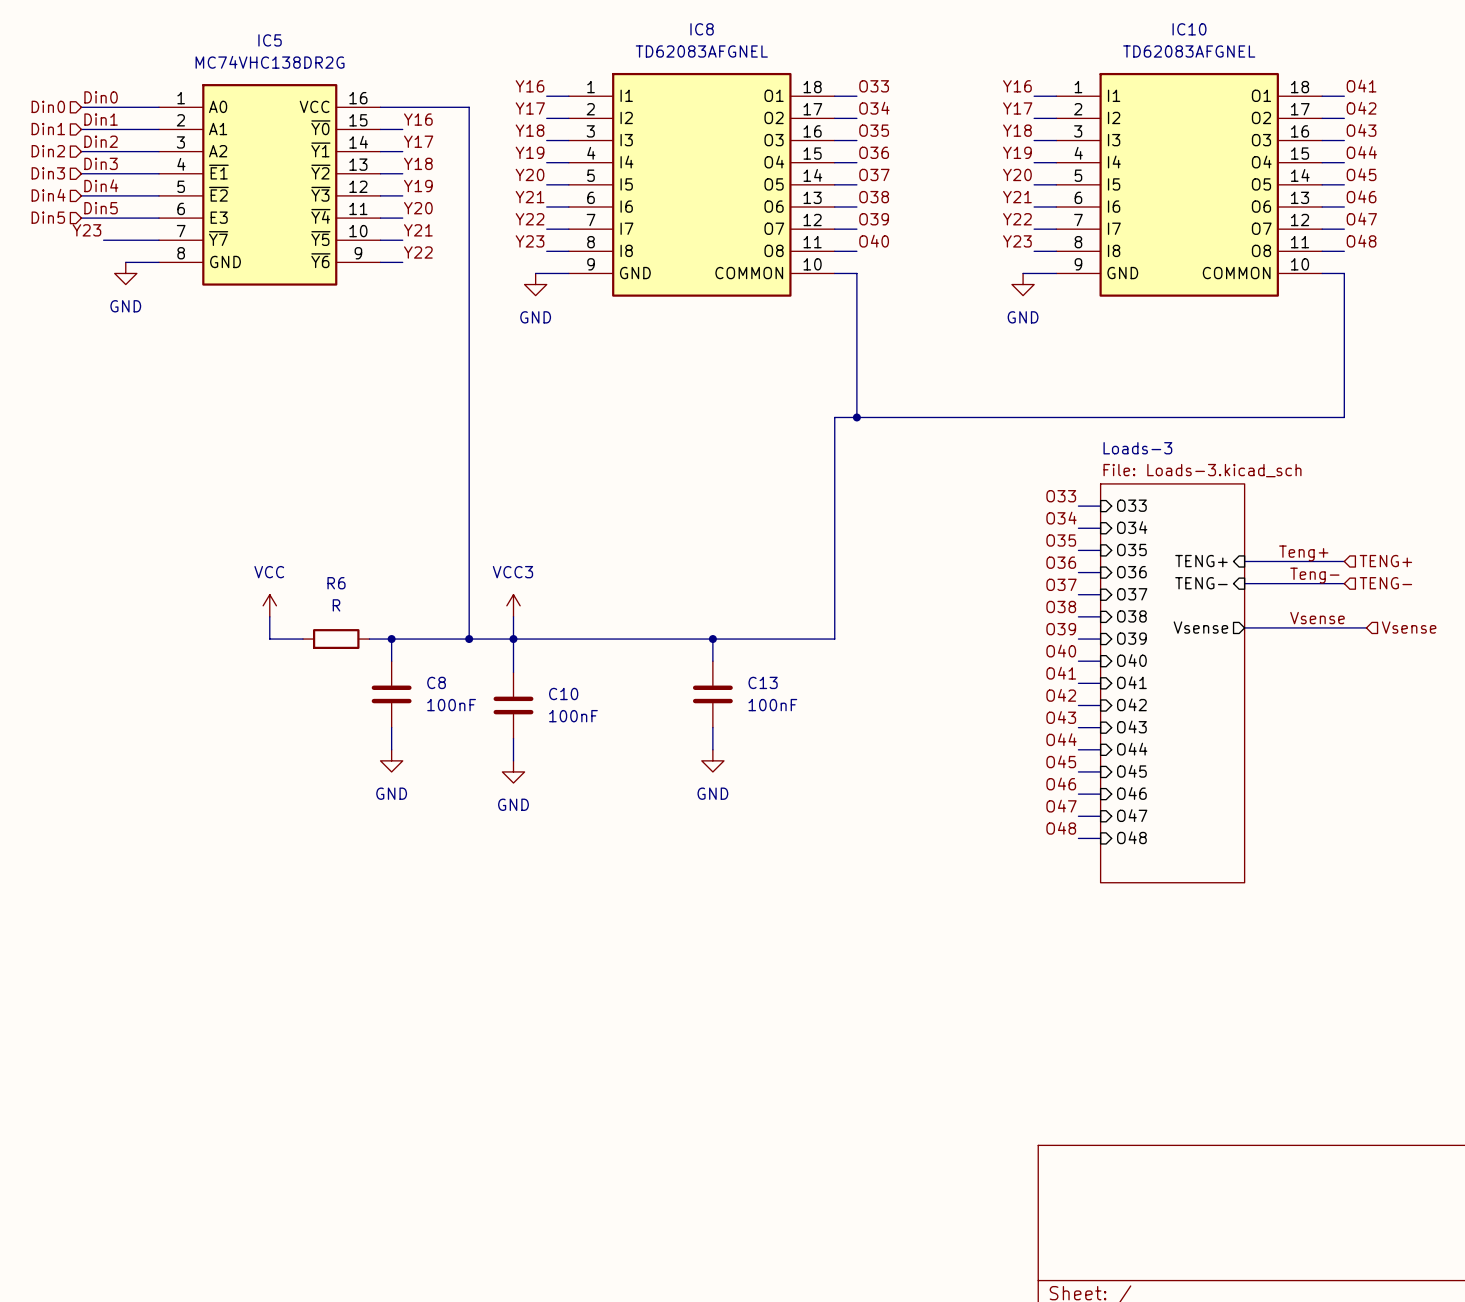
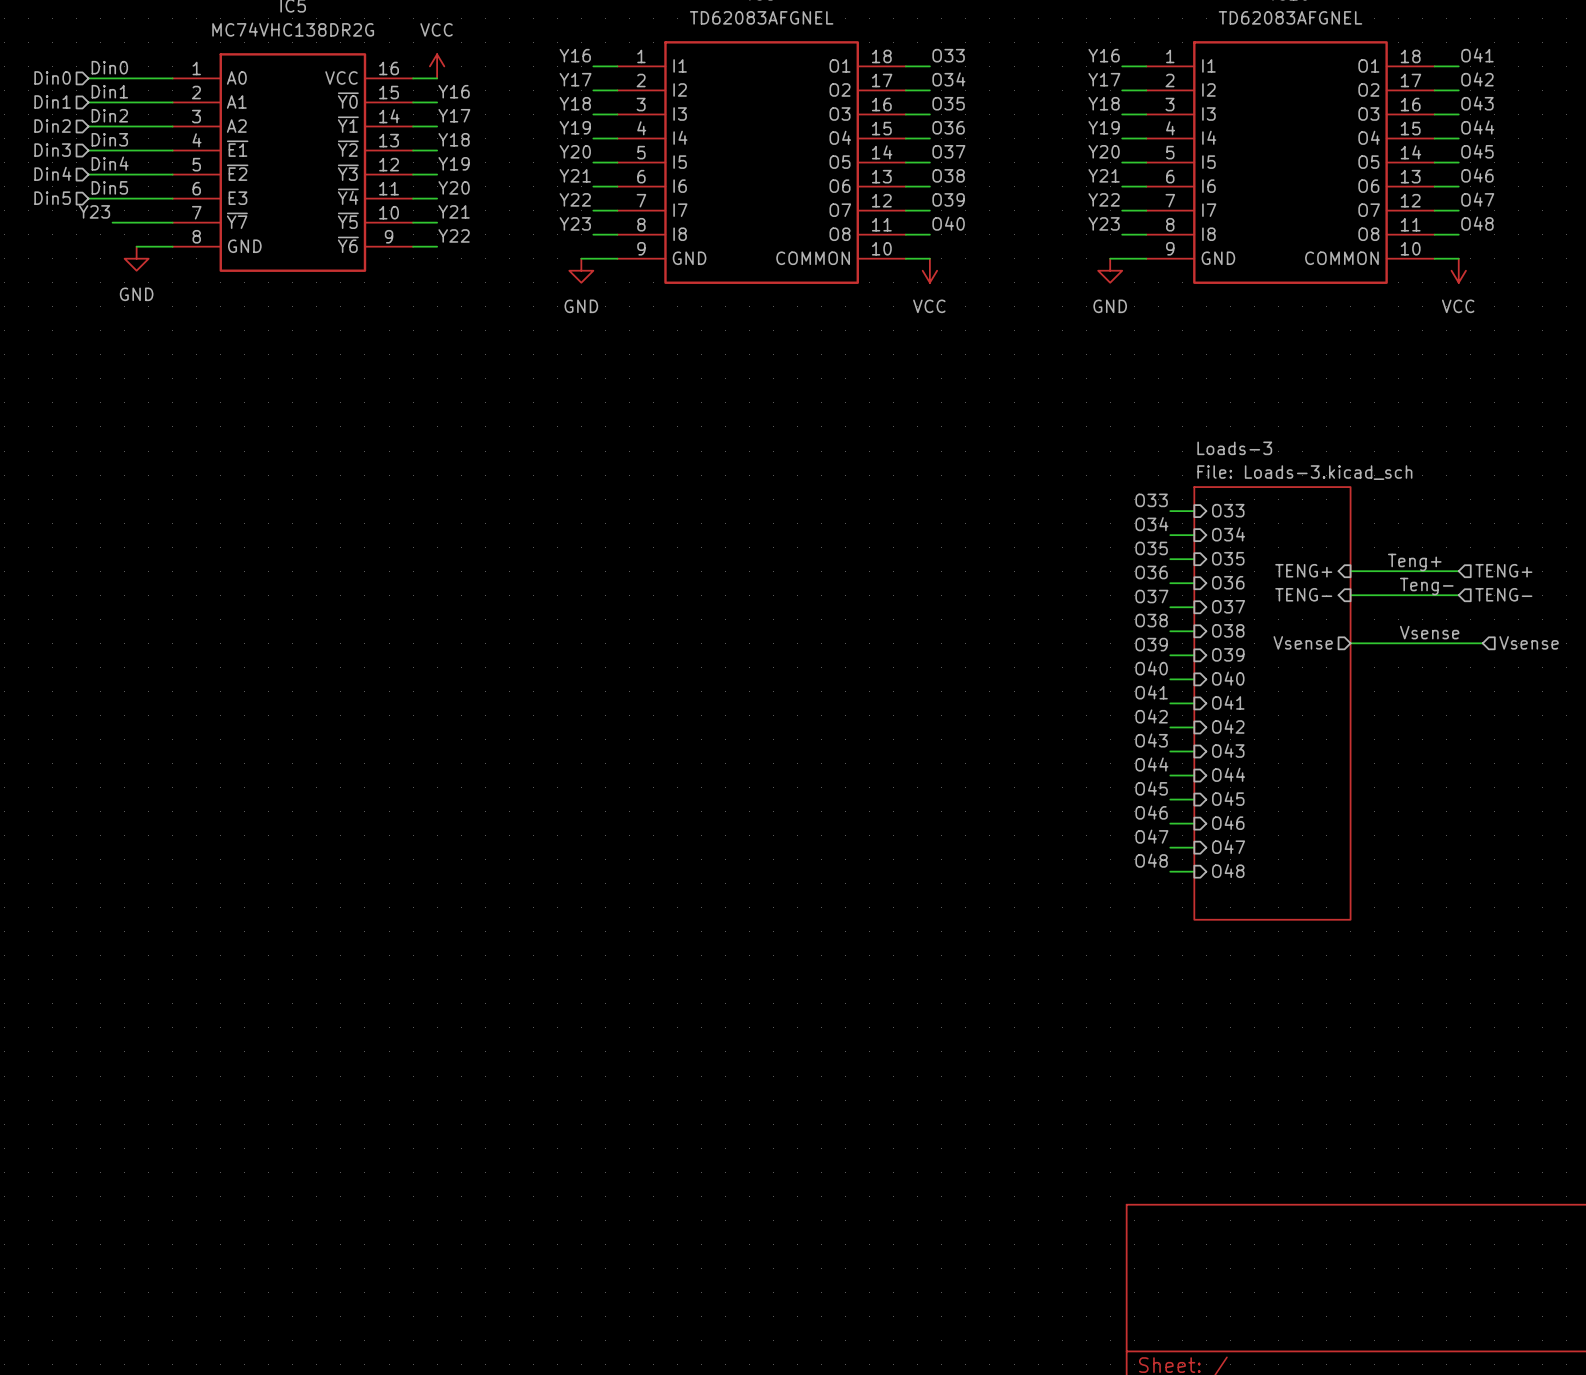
power symbol: none -> VCC (437, 66)
wire: (402, 107) (469, 107) (469, 639) -> none
wire: (856, 273) (856, 417) -> none
wire: (1344, 273) (1344, 417) (834, 417) (834, 639) (369, 639) -> none
power symbol: none -> VCC (929, 270)
power symbol: none -> VCC (1458, 270)
junction: (856, 417) -> none
power symbol: VCC (269, 605) -> none
power symbol: VCC3 (513, 605) -> none
wire: (269, 616) (269, 639) (303, 639) -> none
wire: (513, 616) (513, 672) -> none
R6: R (336, 639) -> none
wire: (391, 639) (391, 661) -> none
junction: (391, 639) -> none
junction: (469, 639) -> none
junction: (513, 639) -> none
wire: (712, 639) (712, 661) -> none
junction: (712, 639) -> none
C8: 100nF (391, 694) -> none
C13: 100nF (712, 694) -> none
C10: 100nF (513, 705) -> none
wire: (391, 727) (391, 749) -> none
wire: (712, 727) (712, 749) -> none
wire: (513, 738) (513, 760) -> none
power symbol: GND (391, 760) -> none
power symbol: GND (712, 760) -> none
power symbol: GND (513, 771) -> none

